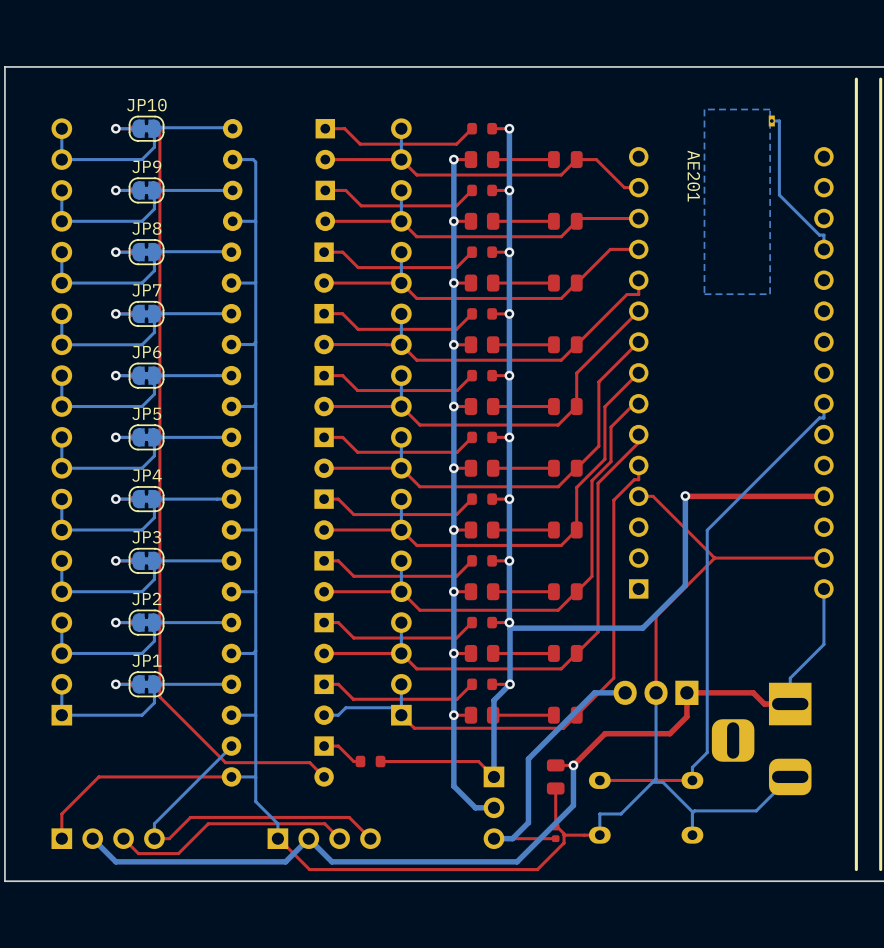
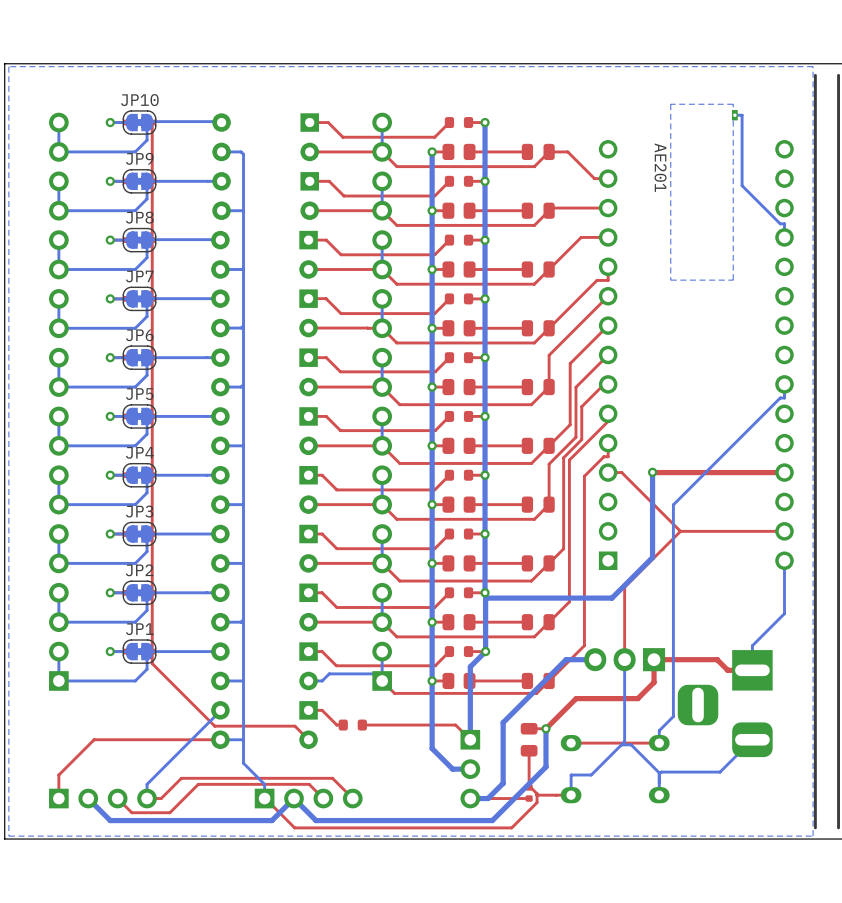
bottom zone outline: none -> (813, 66) (813, 836) (8, 836) (8, 66) (813, 66)

